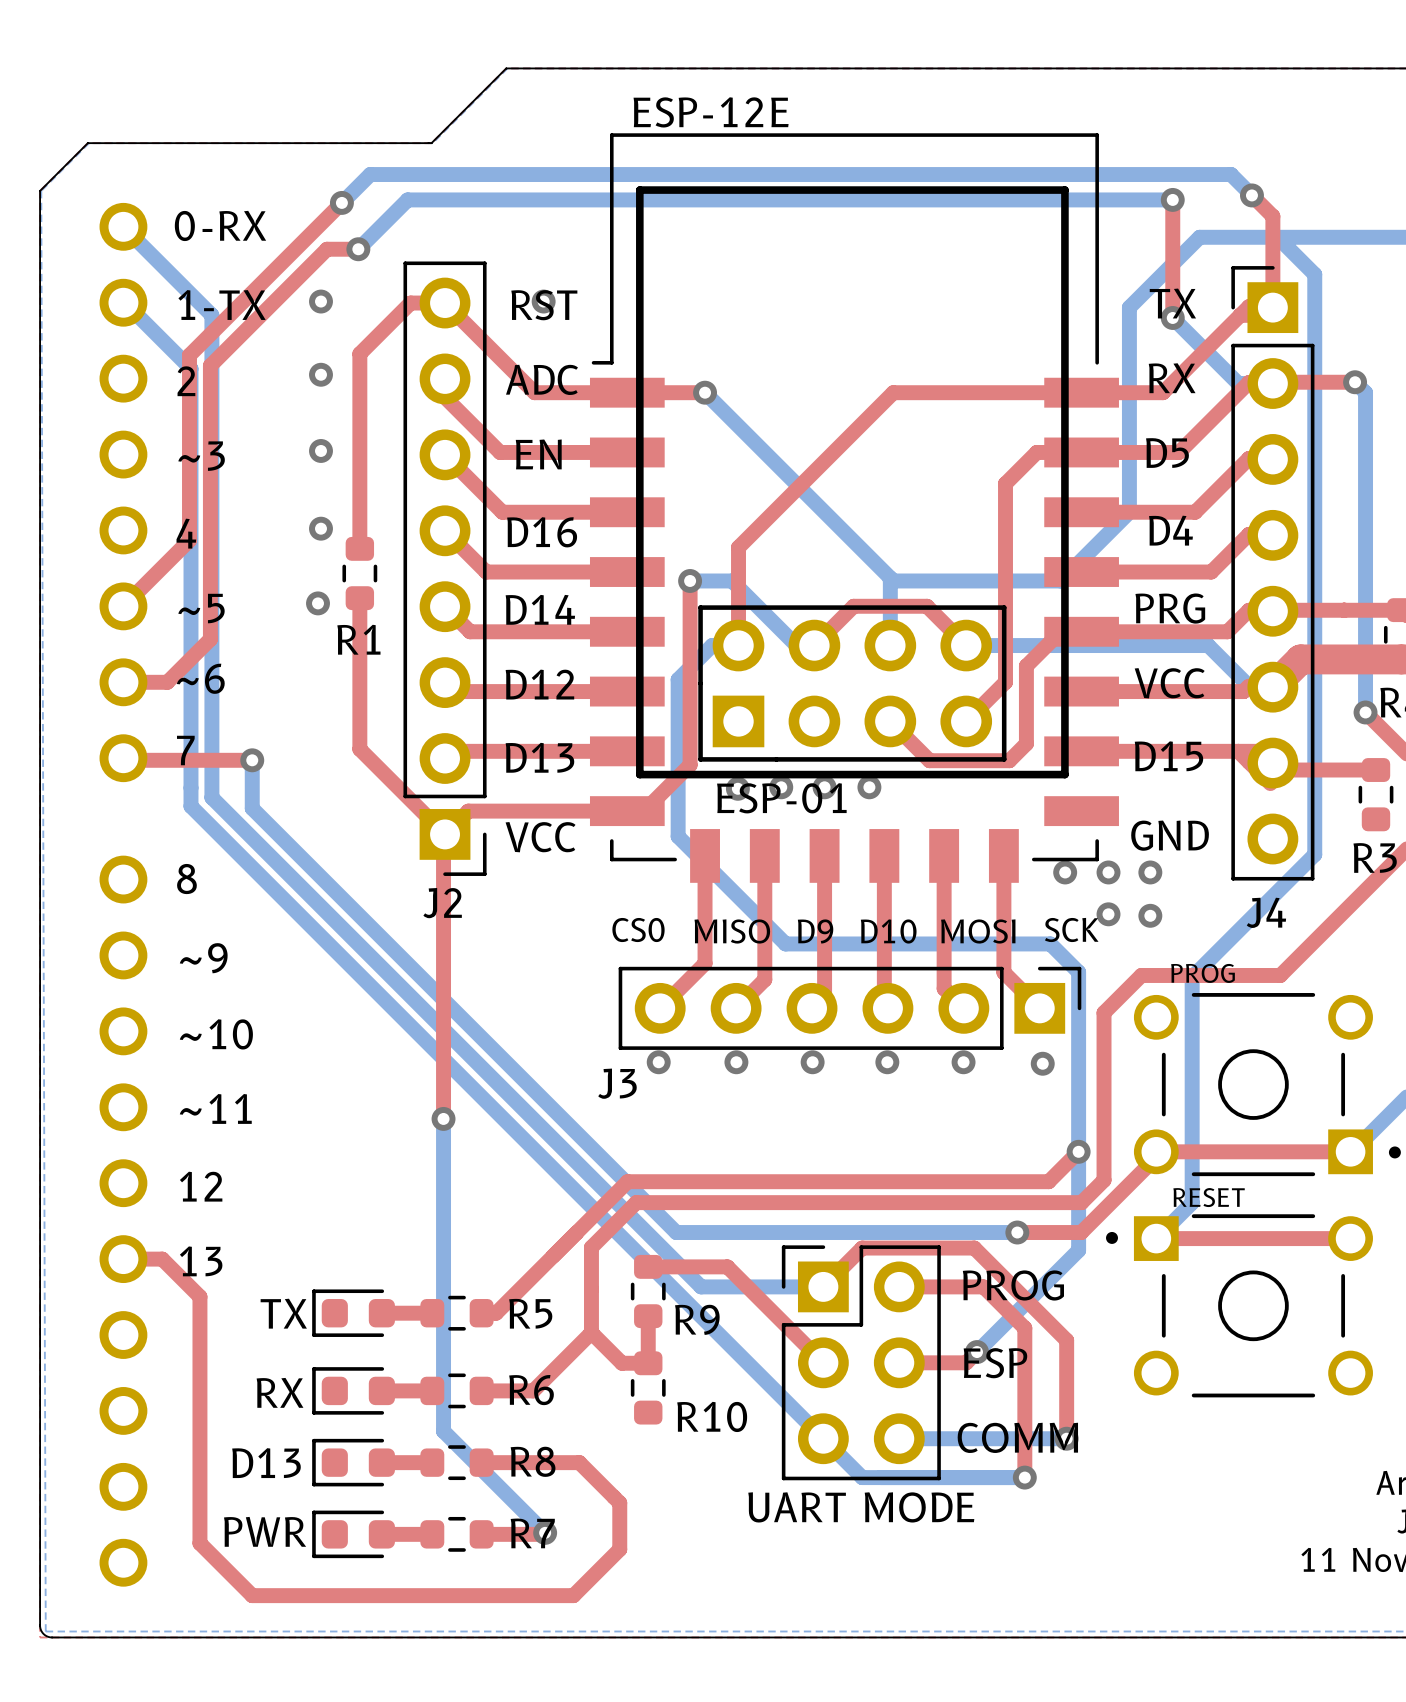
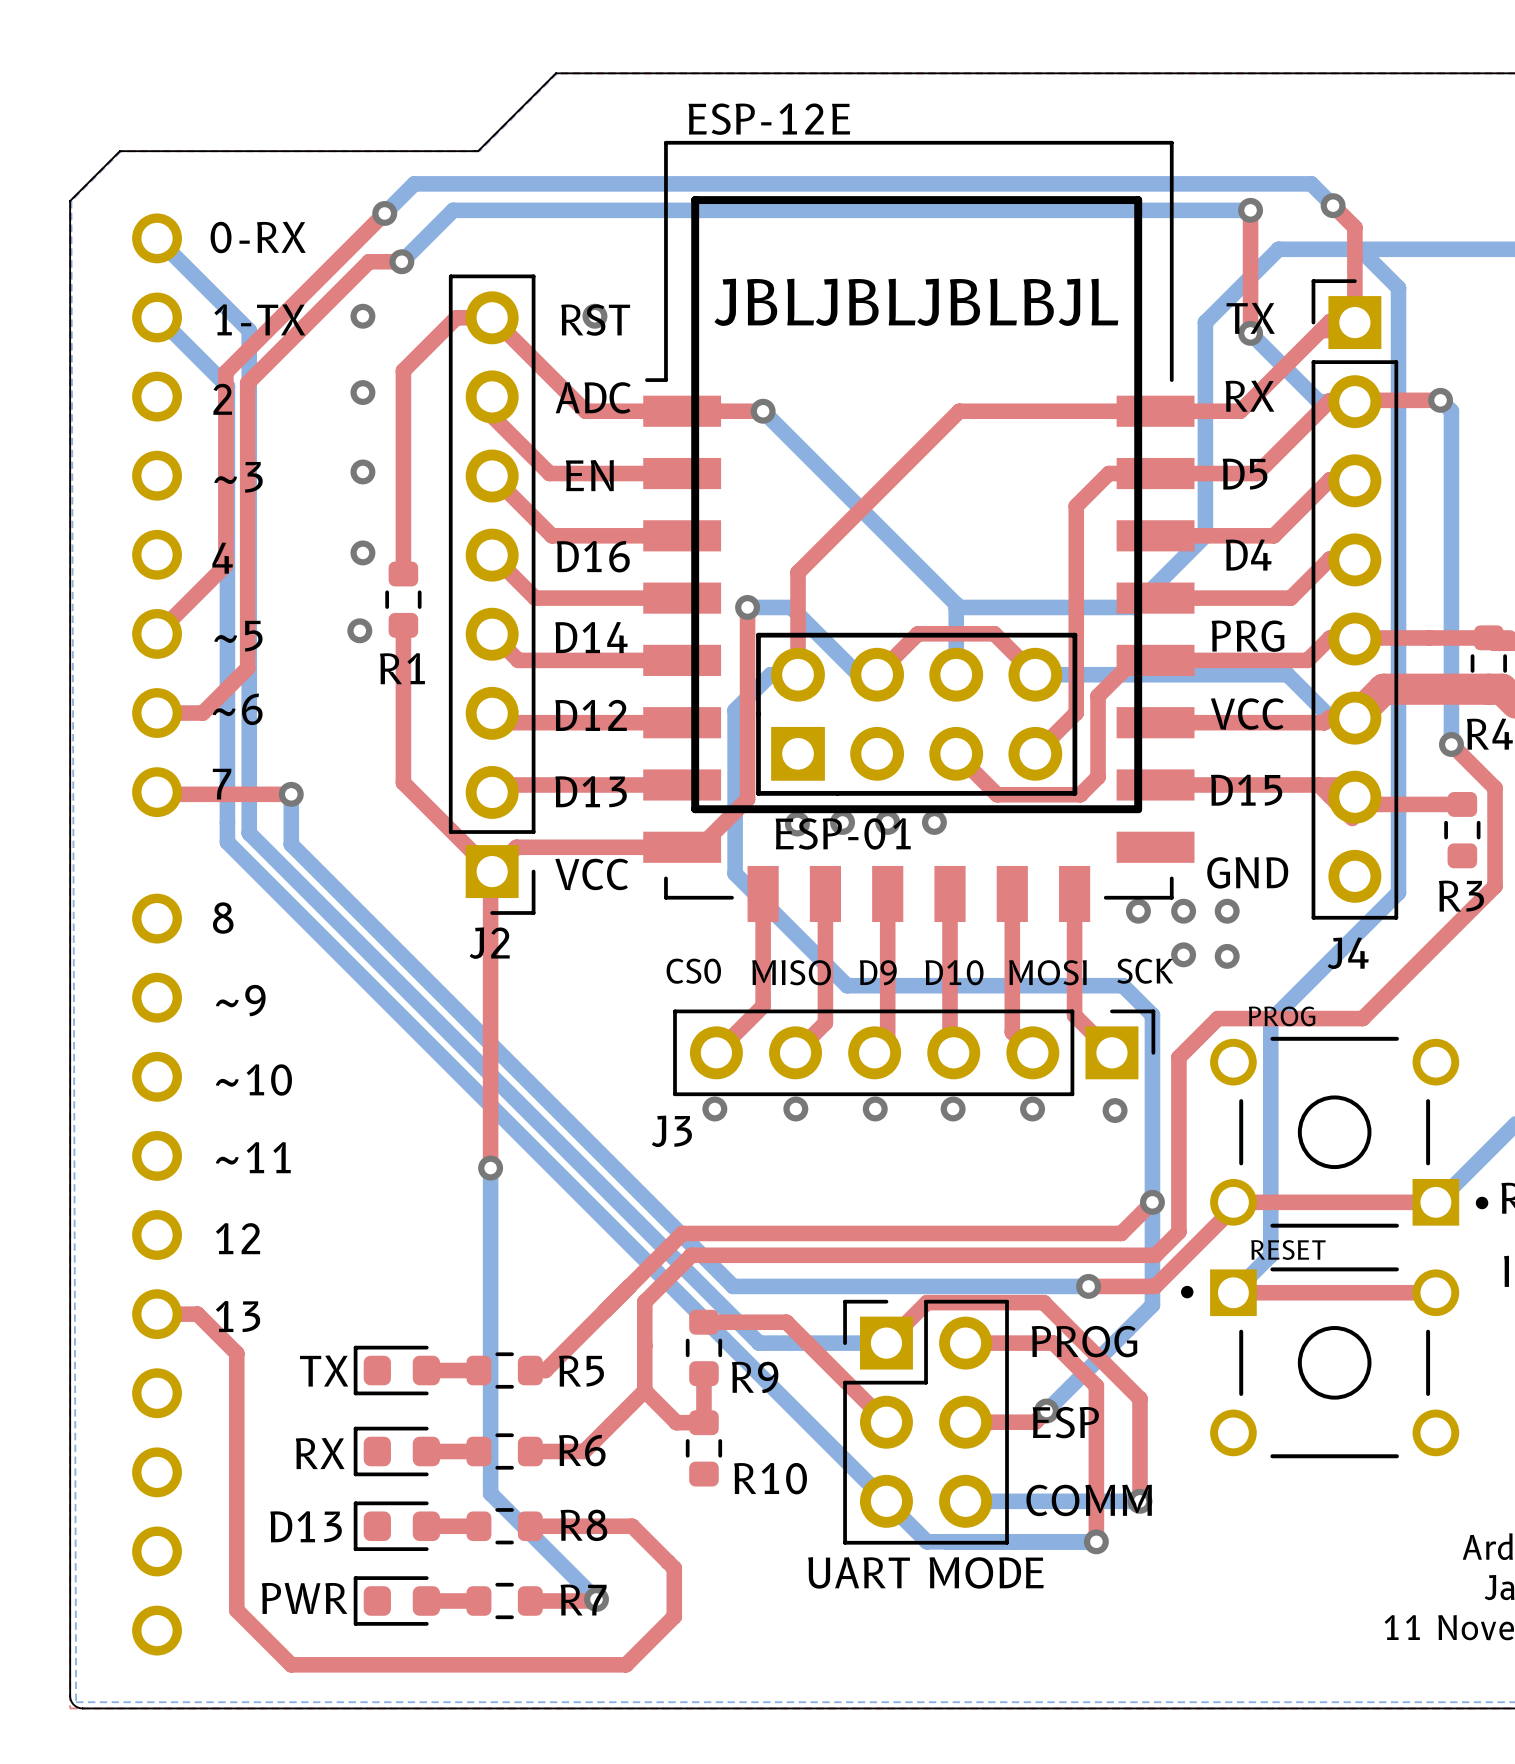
text: none -> JBLJBLJBLBJL (916, 302)

